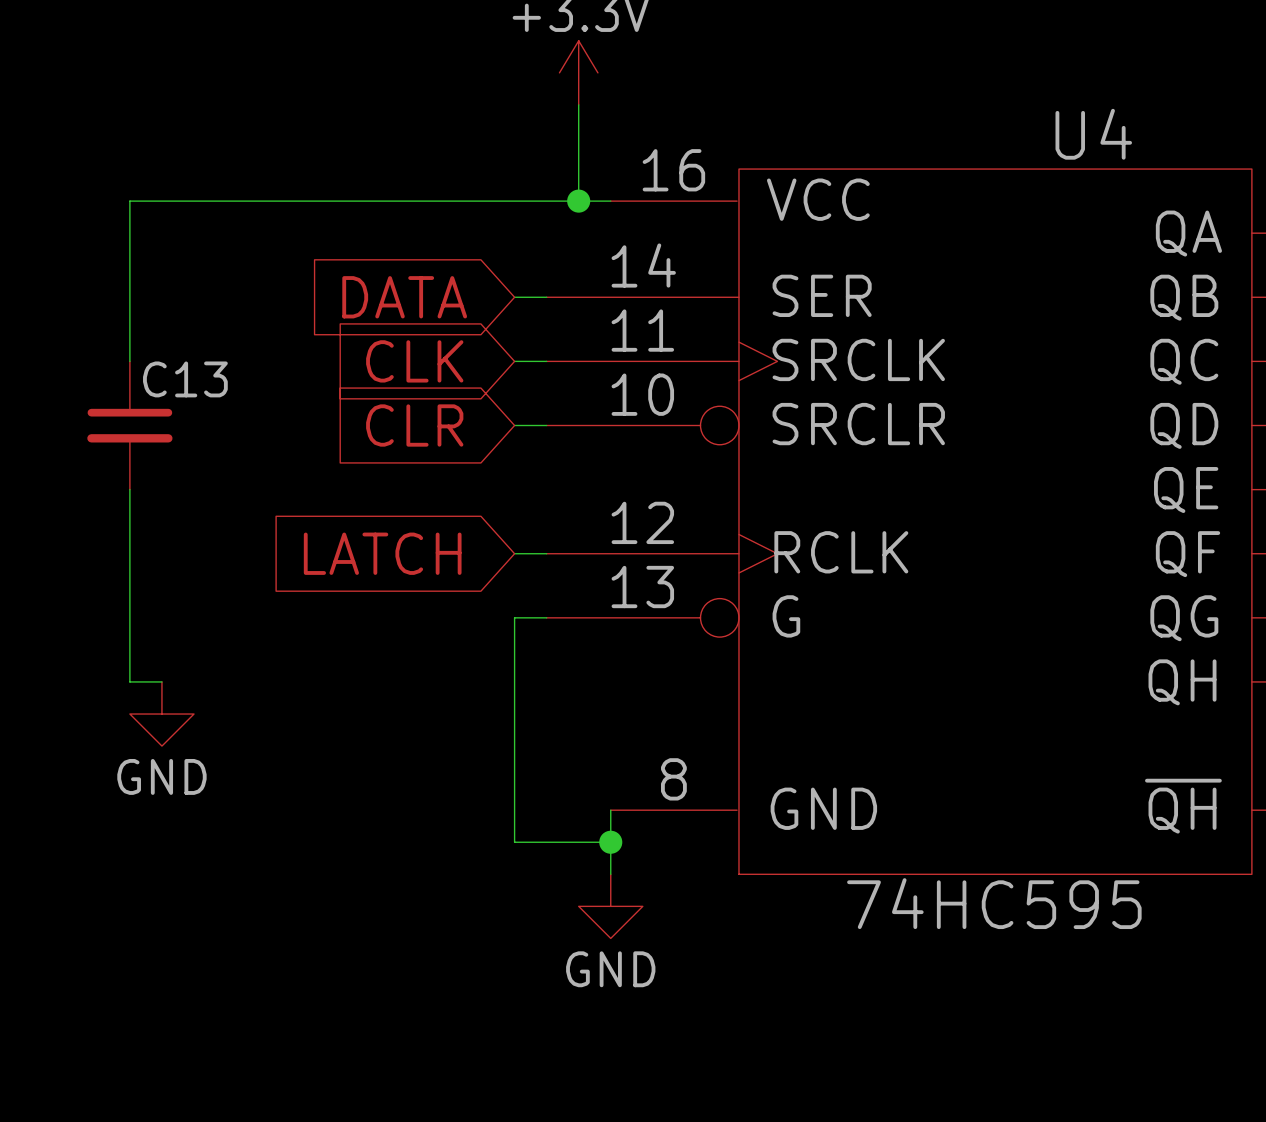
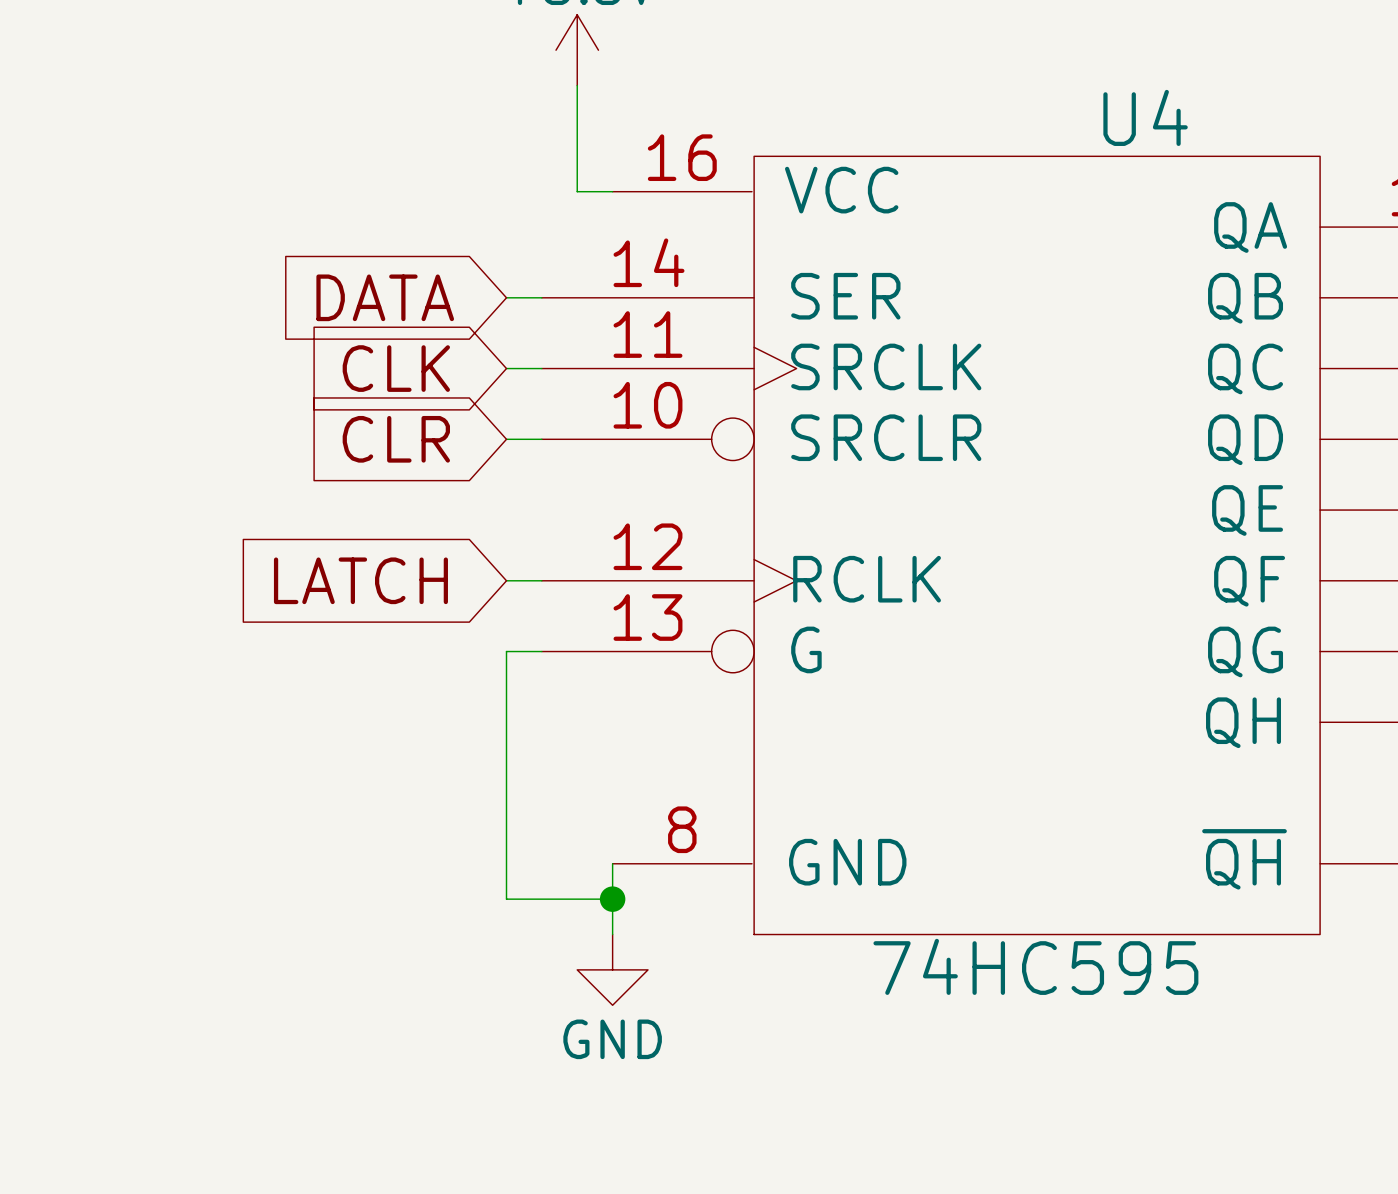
wire: (578, 201) (129, 201) (129, 361) -> none
junction: (578, 201) -> none
C13: (129, 425) -> none
wire: (129, 489) (129, 681) (161, 681) -> none
power symbol: GND (161, 714) -> none

